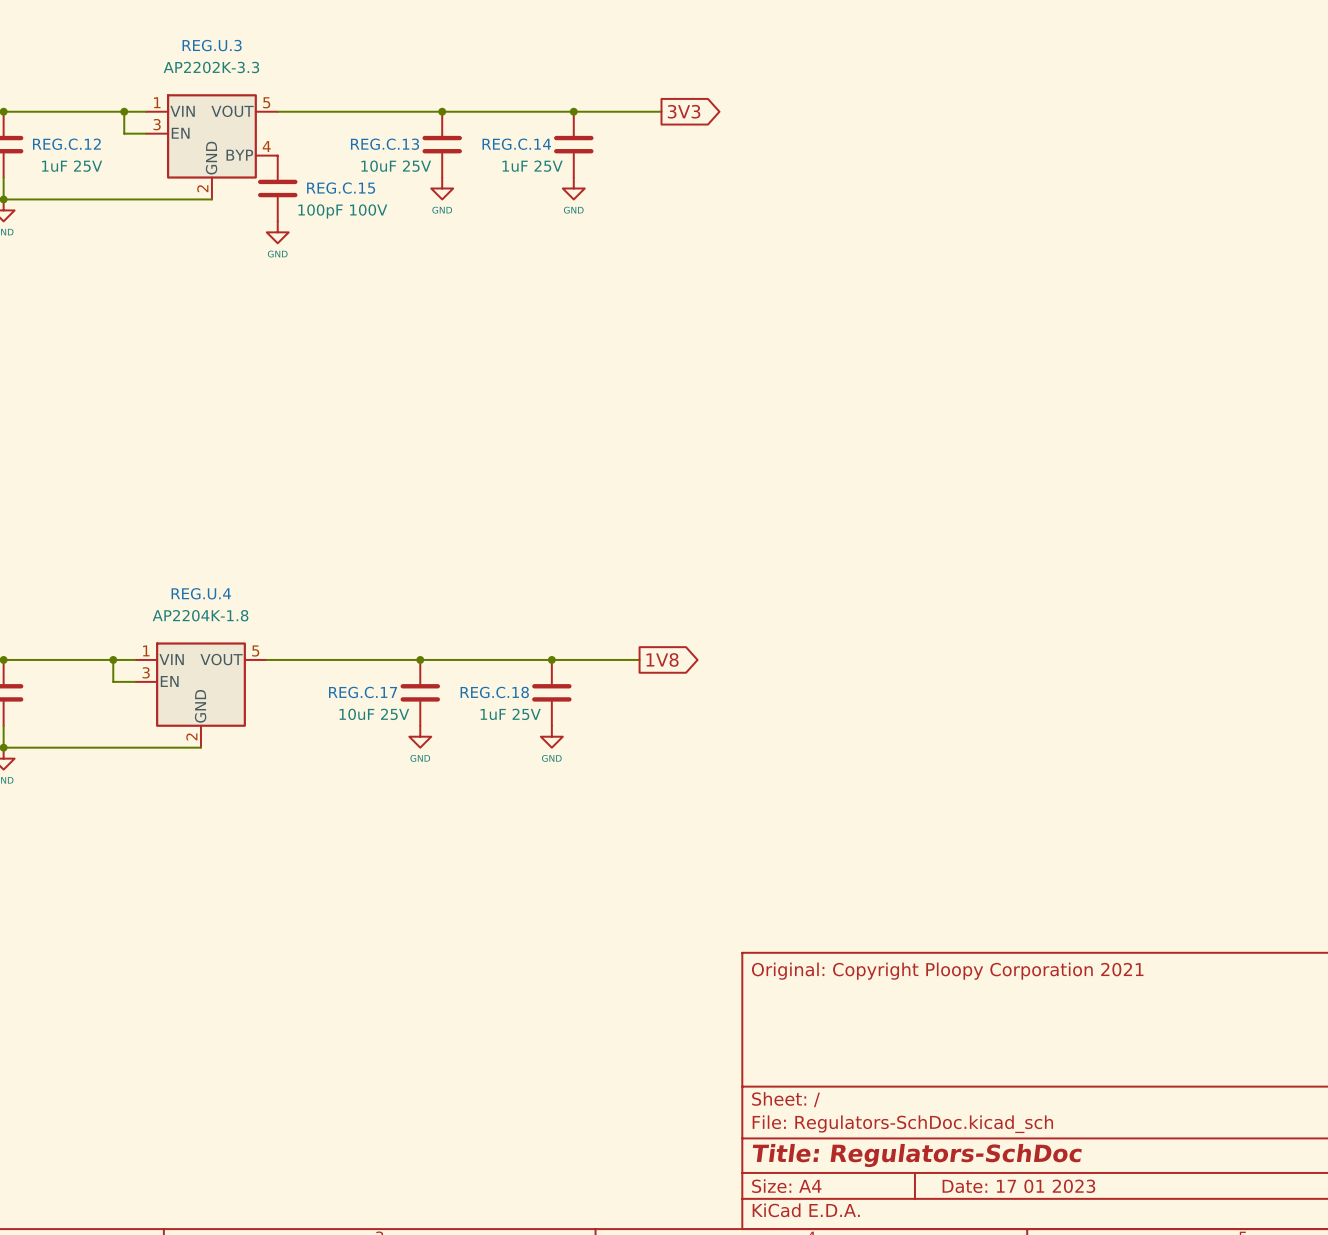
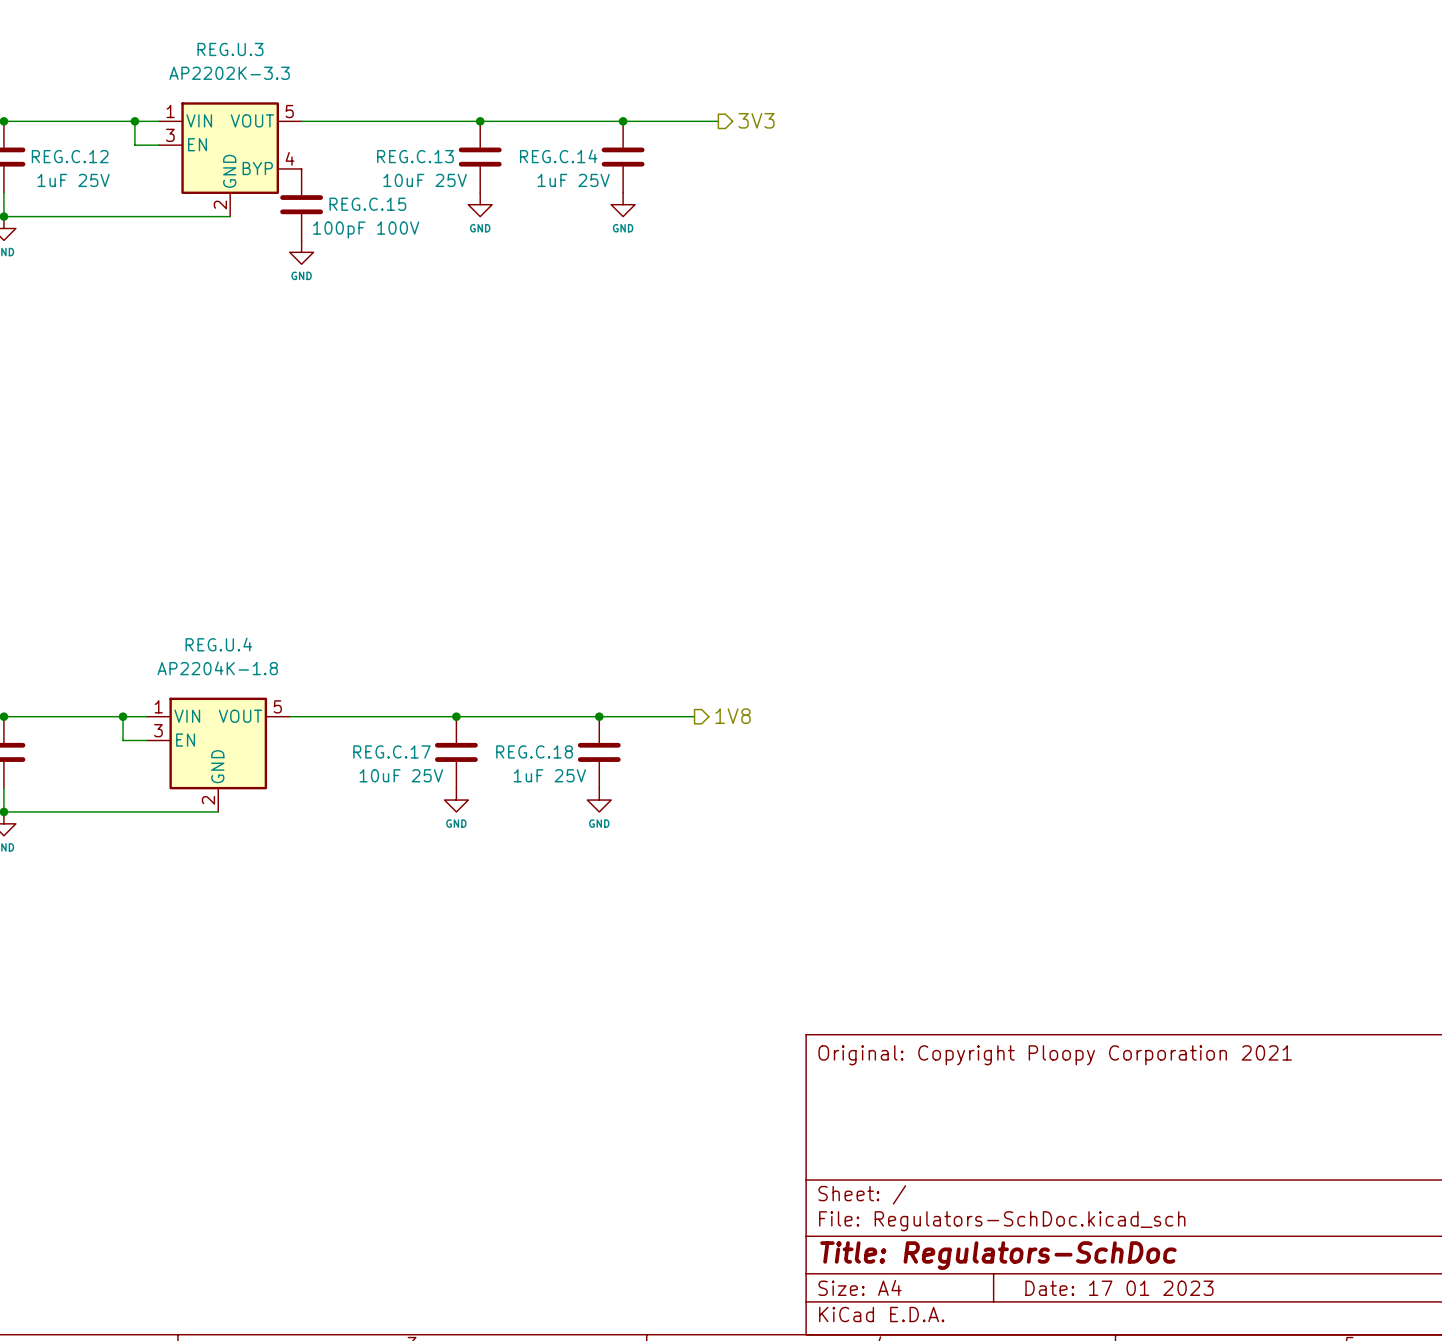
global label: 3V3 (684, 111) -> none
hierarchical label: none -> 3V3 (756, 120)
global label: 1V8 (662, 659) -> none
hierarchical label: none -> 1V8 (733, 716)

